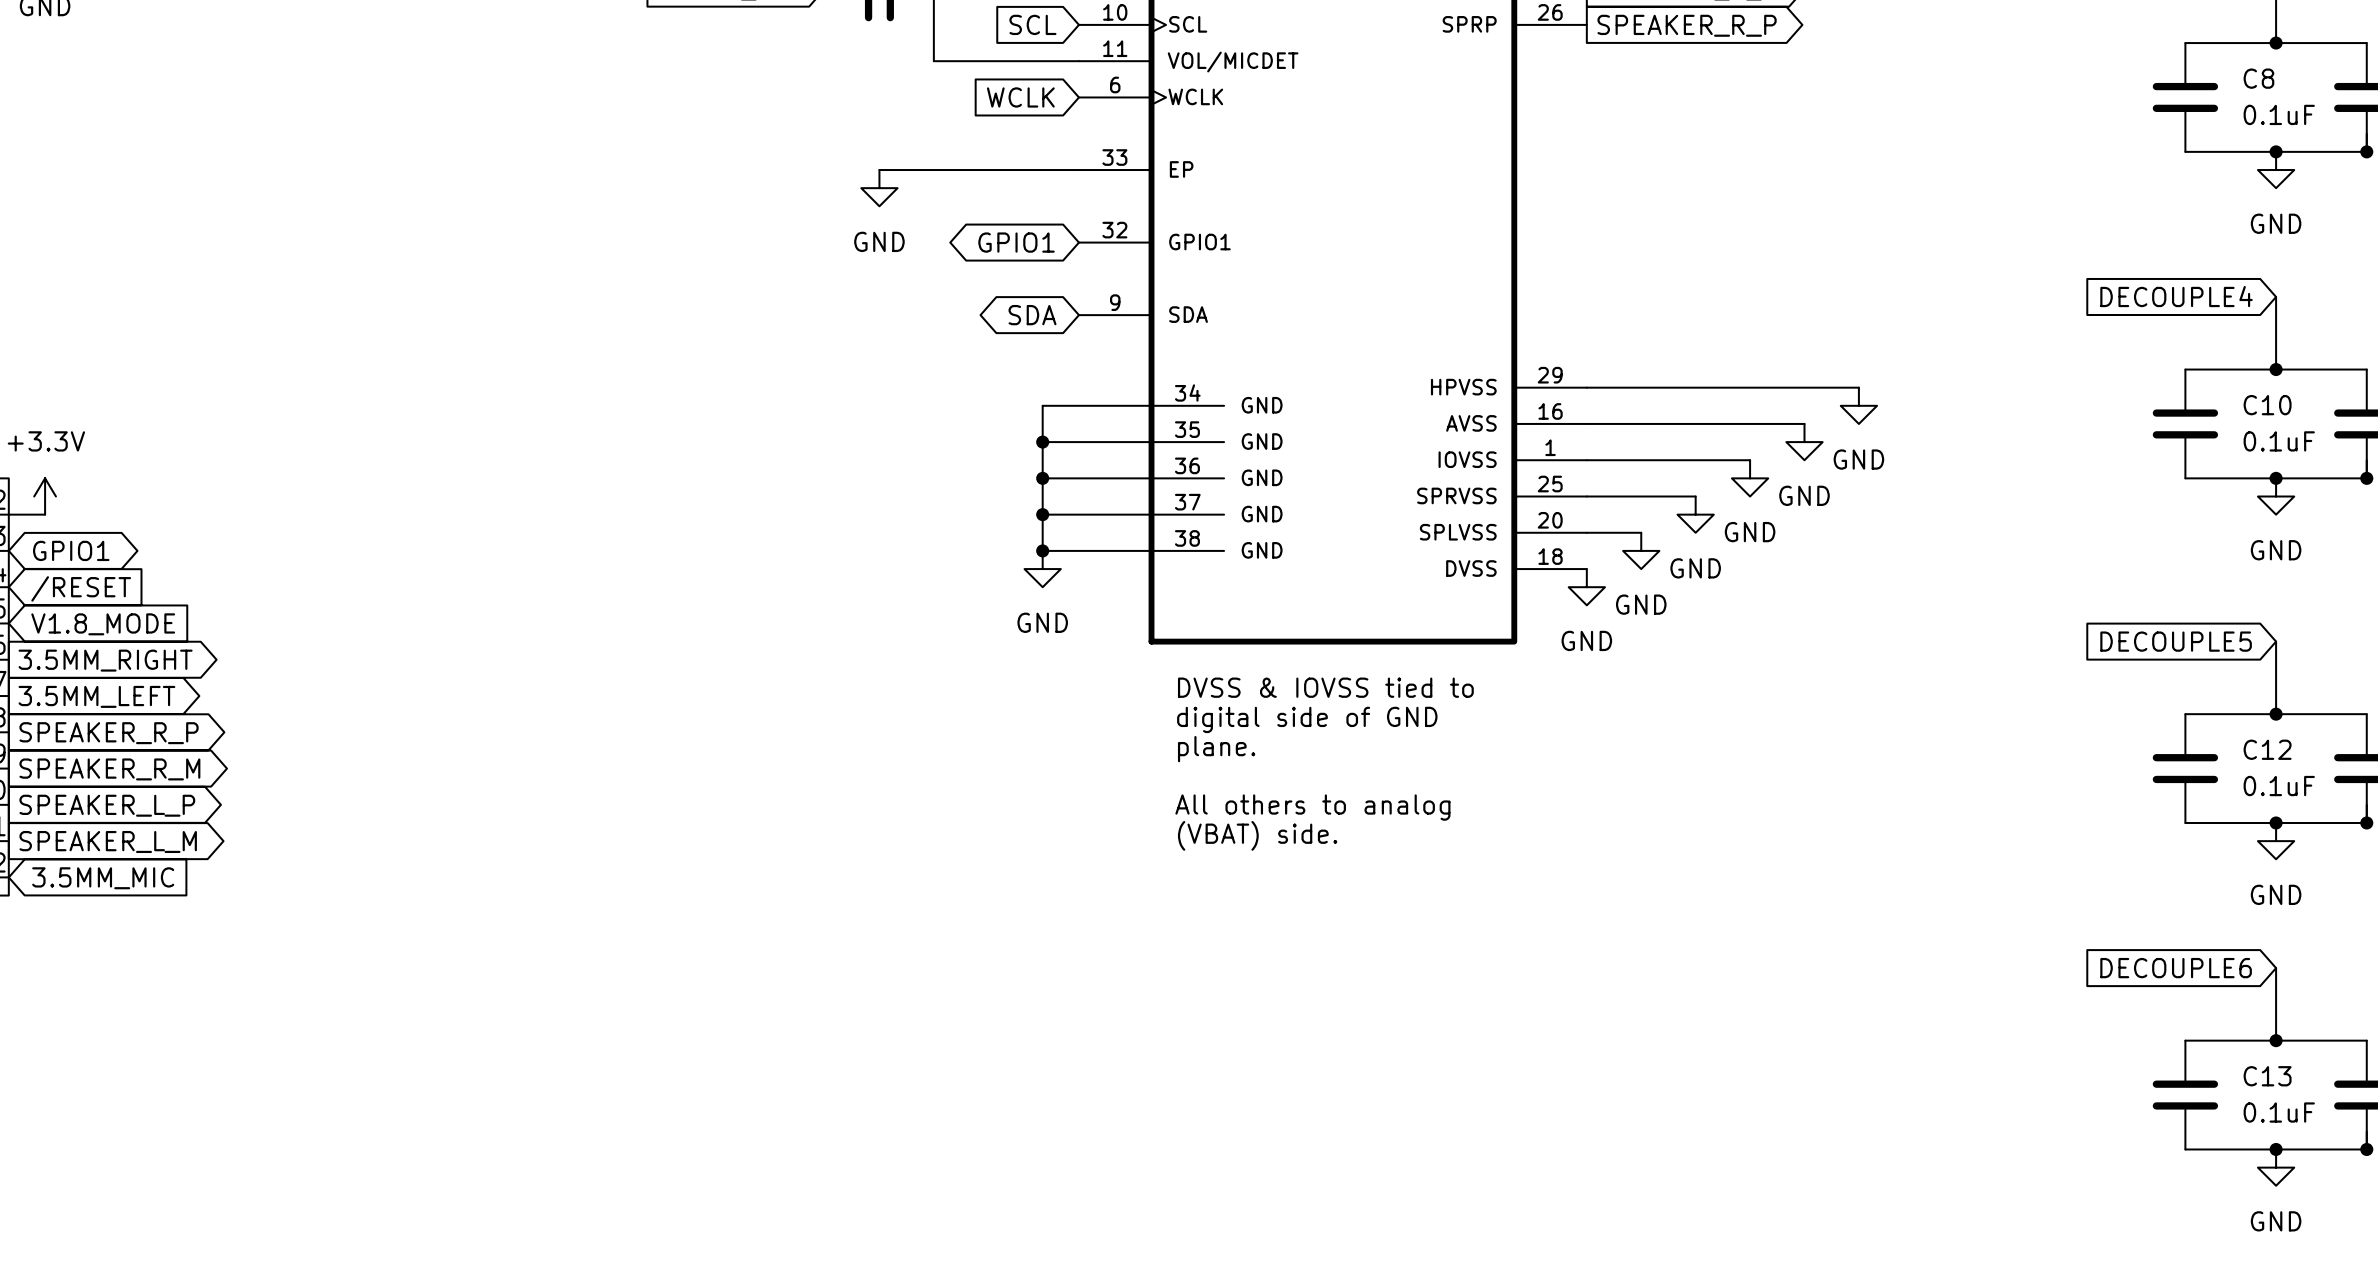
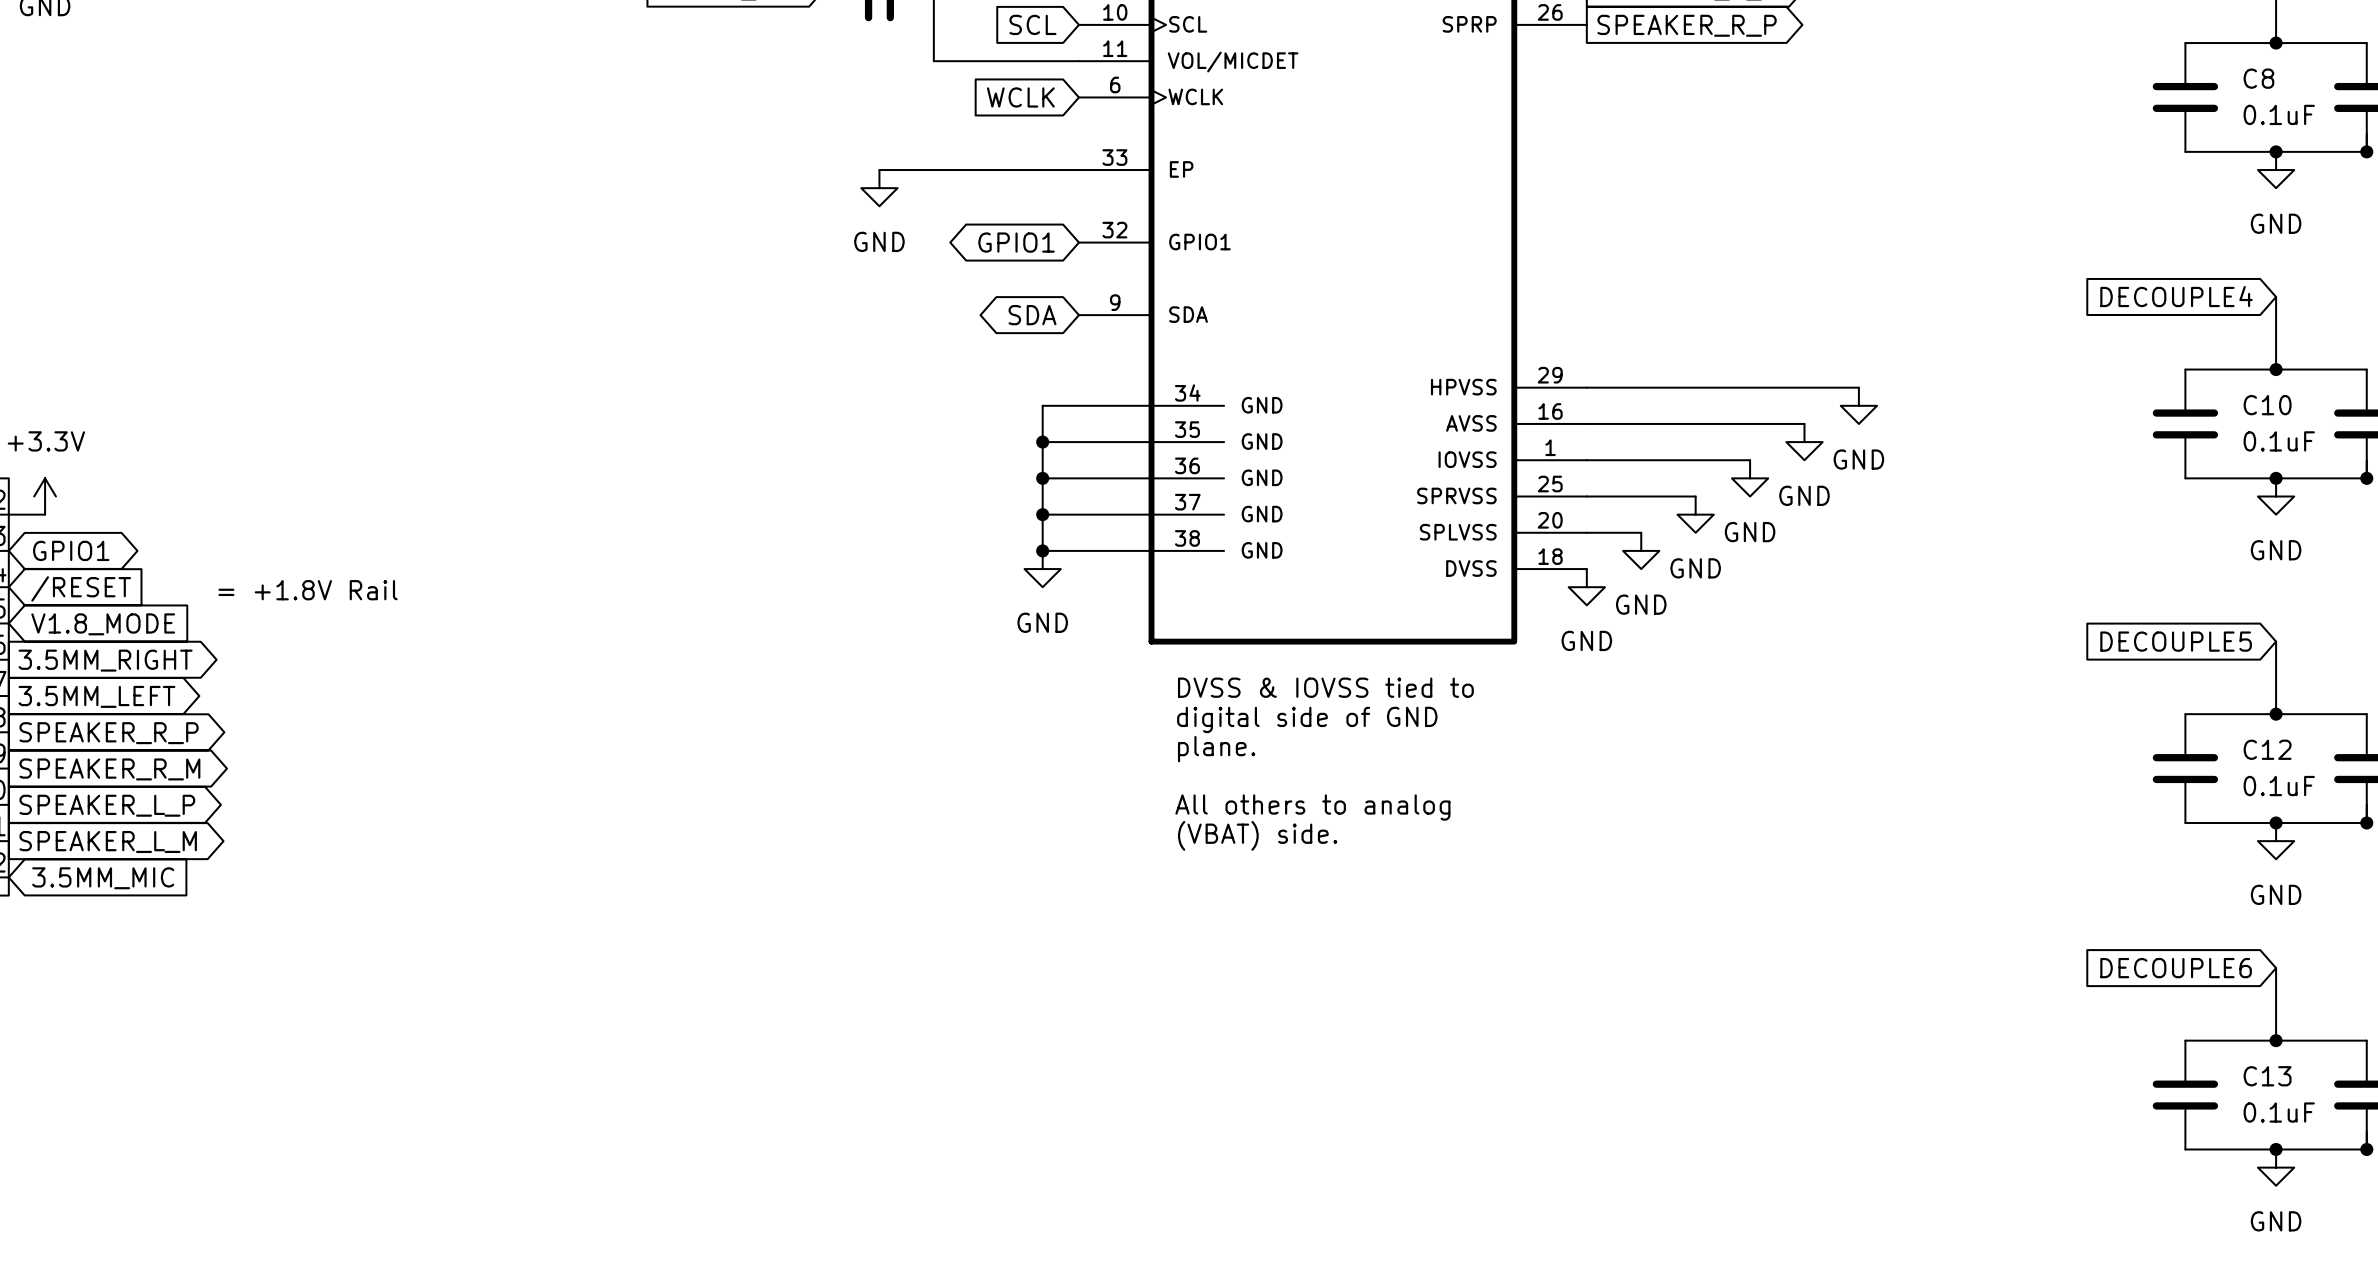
text: none -> = +1.8V Rail (308, 590)

